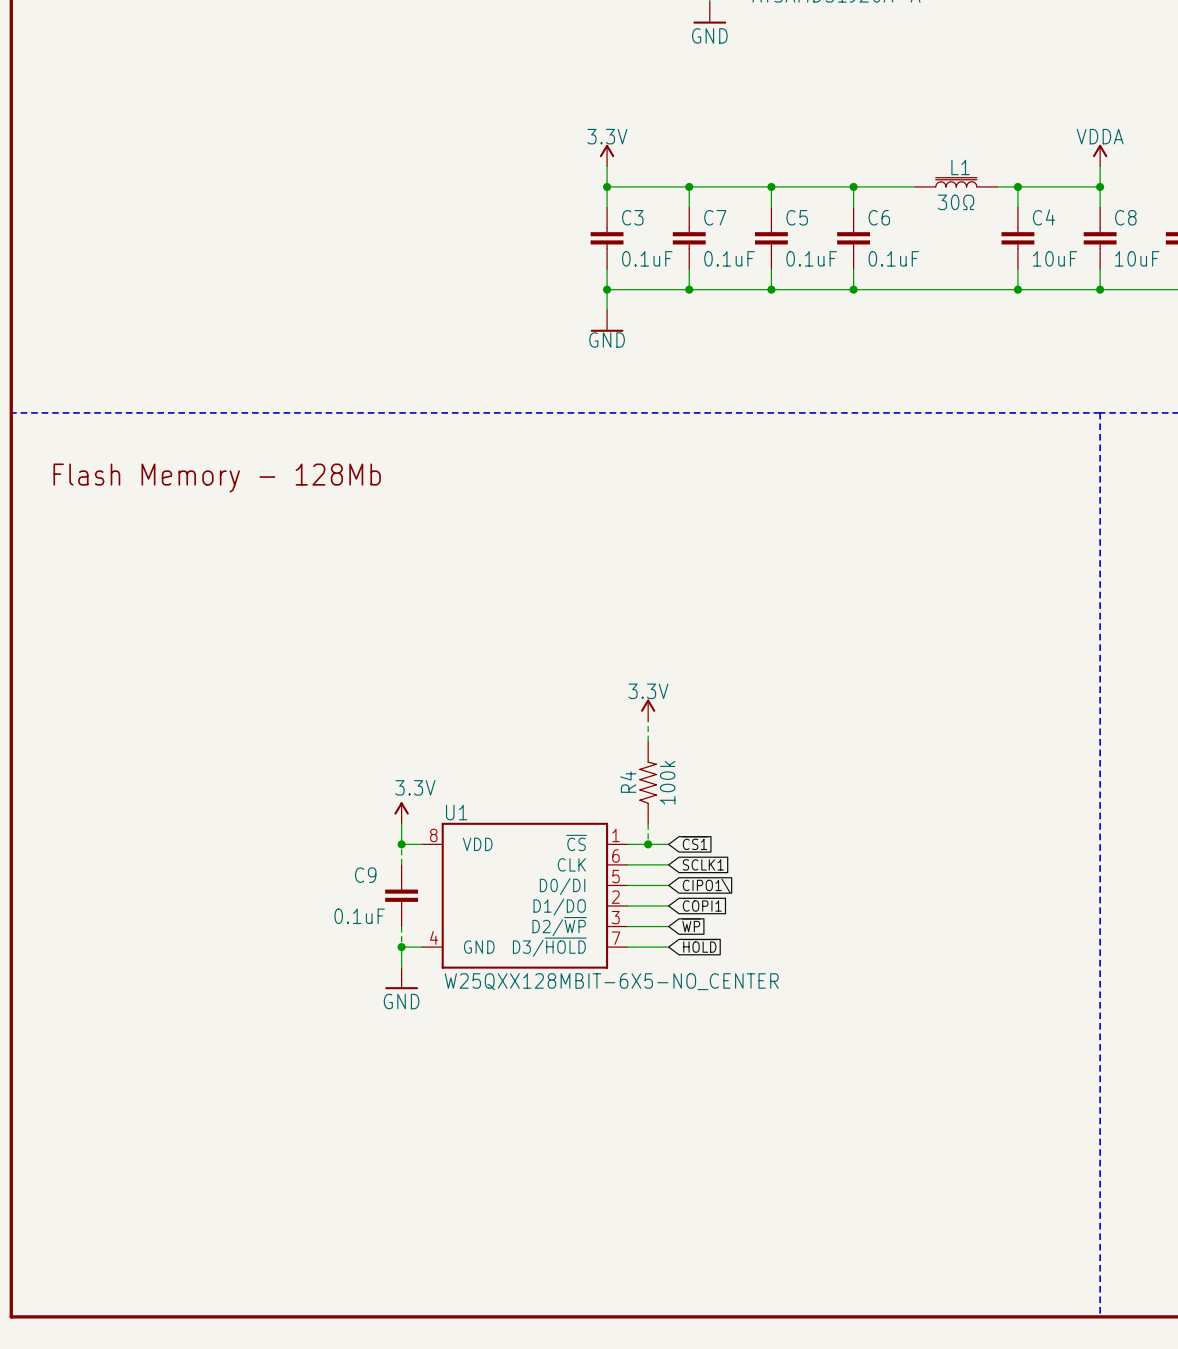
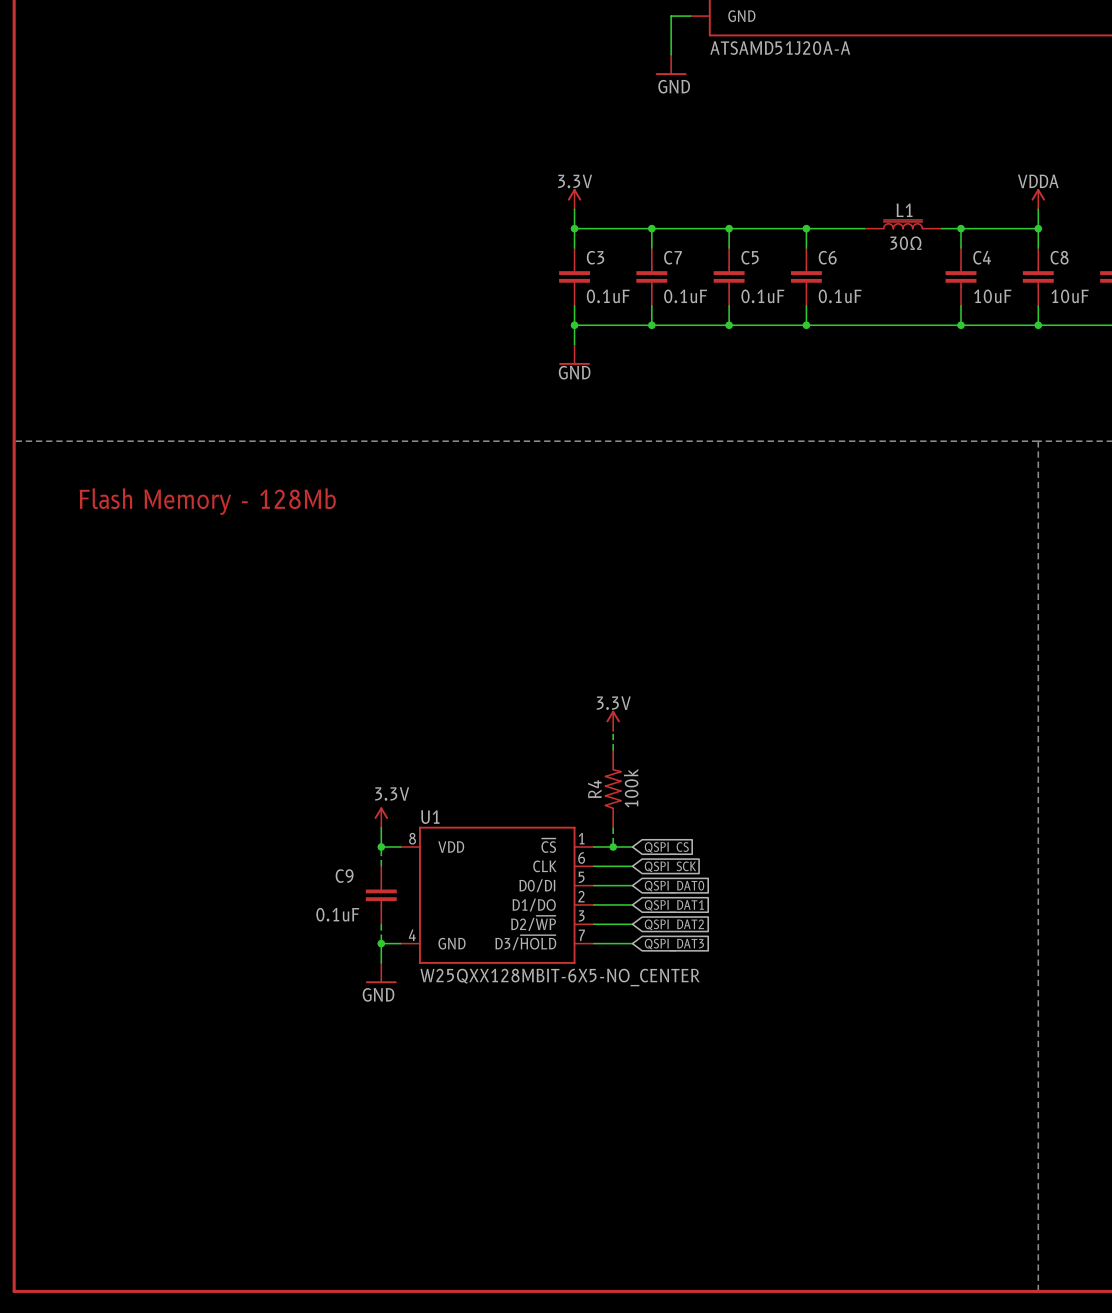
global label: ~{CS1} (694, 843) -> QSPI_CS (666, 848)
global label: SCLK1 (703, 864) -> QSPI_SCK (670, 867)
global label: CIPO1\ (706, 885) -> QSPI_DAT0 (674, 887)
global label: COPI1 (702, 906) -> QSPI_DAT1 (674, 906)
global label: ~{WP} (691, 925) -> QSPI_DAT2 (674, 925)
global label: ~{HOLD} (699, 945) -> QSPI_DAT3 (674, 945)

